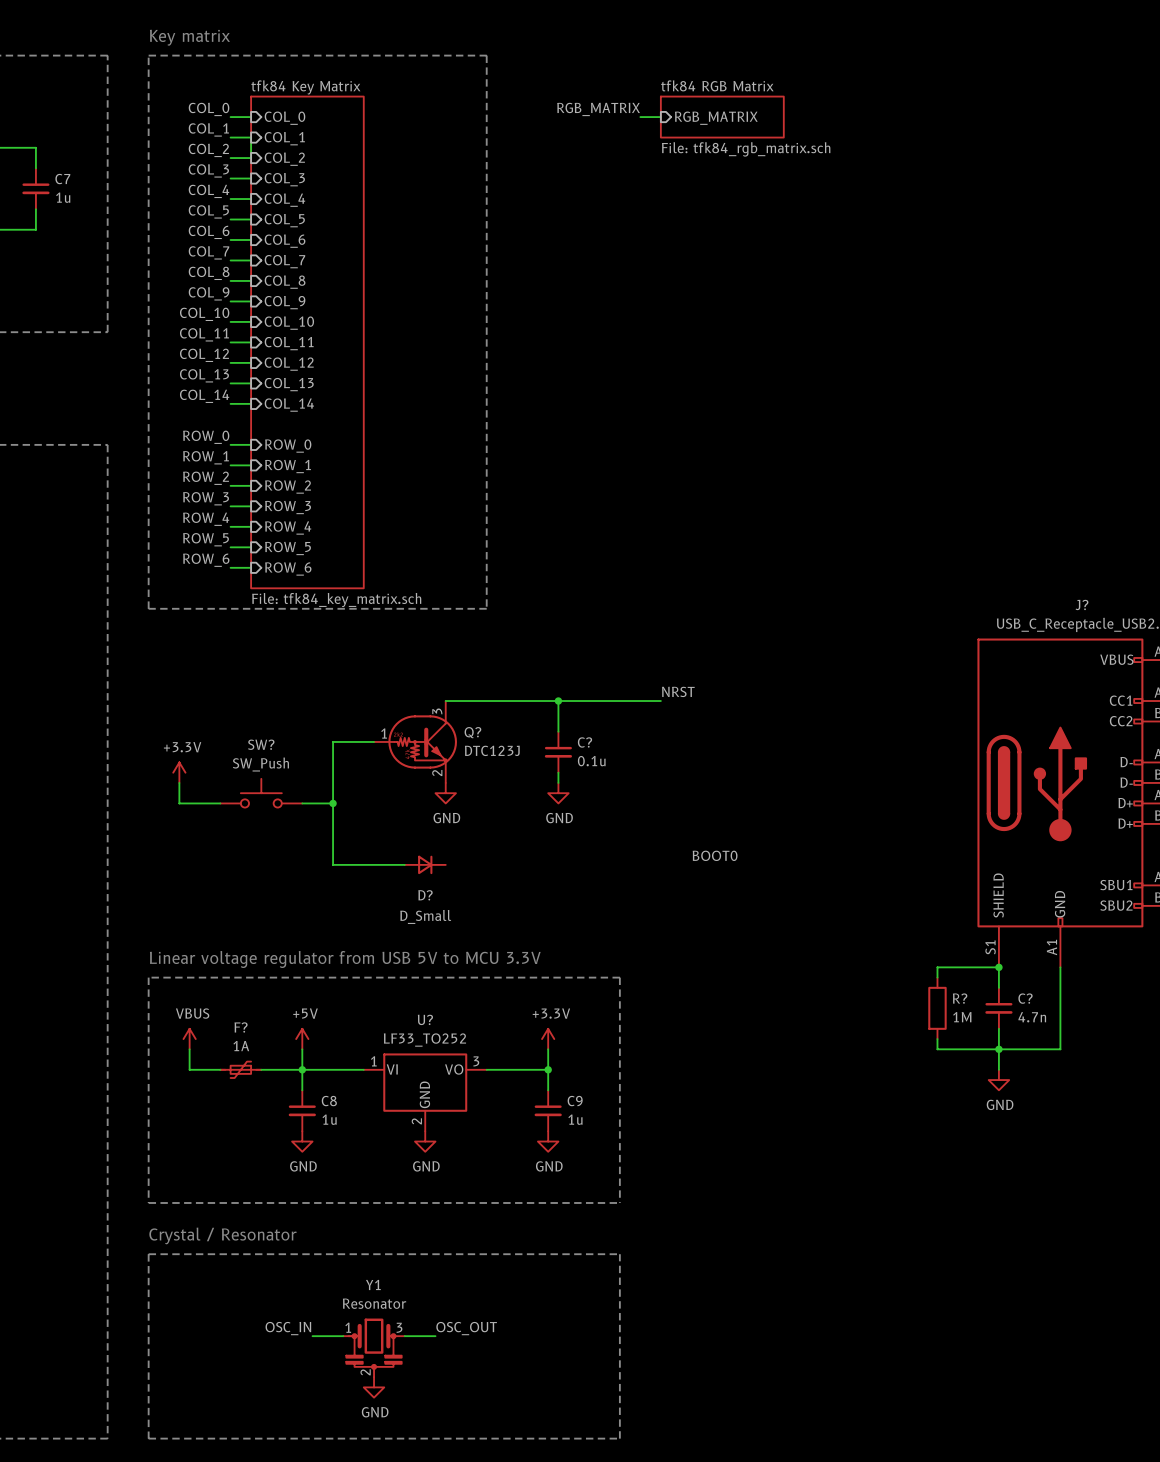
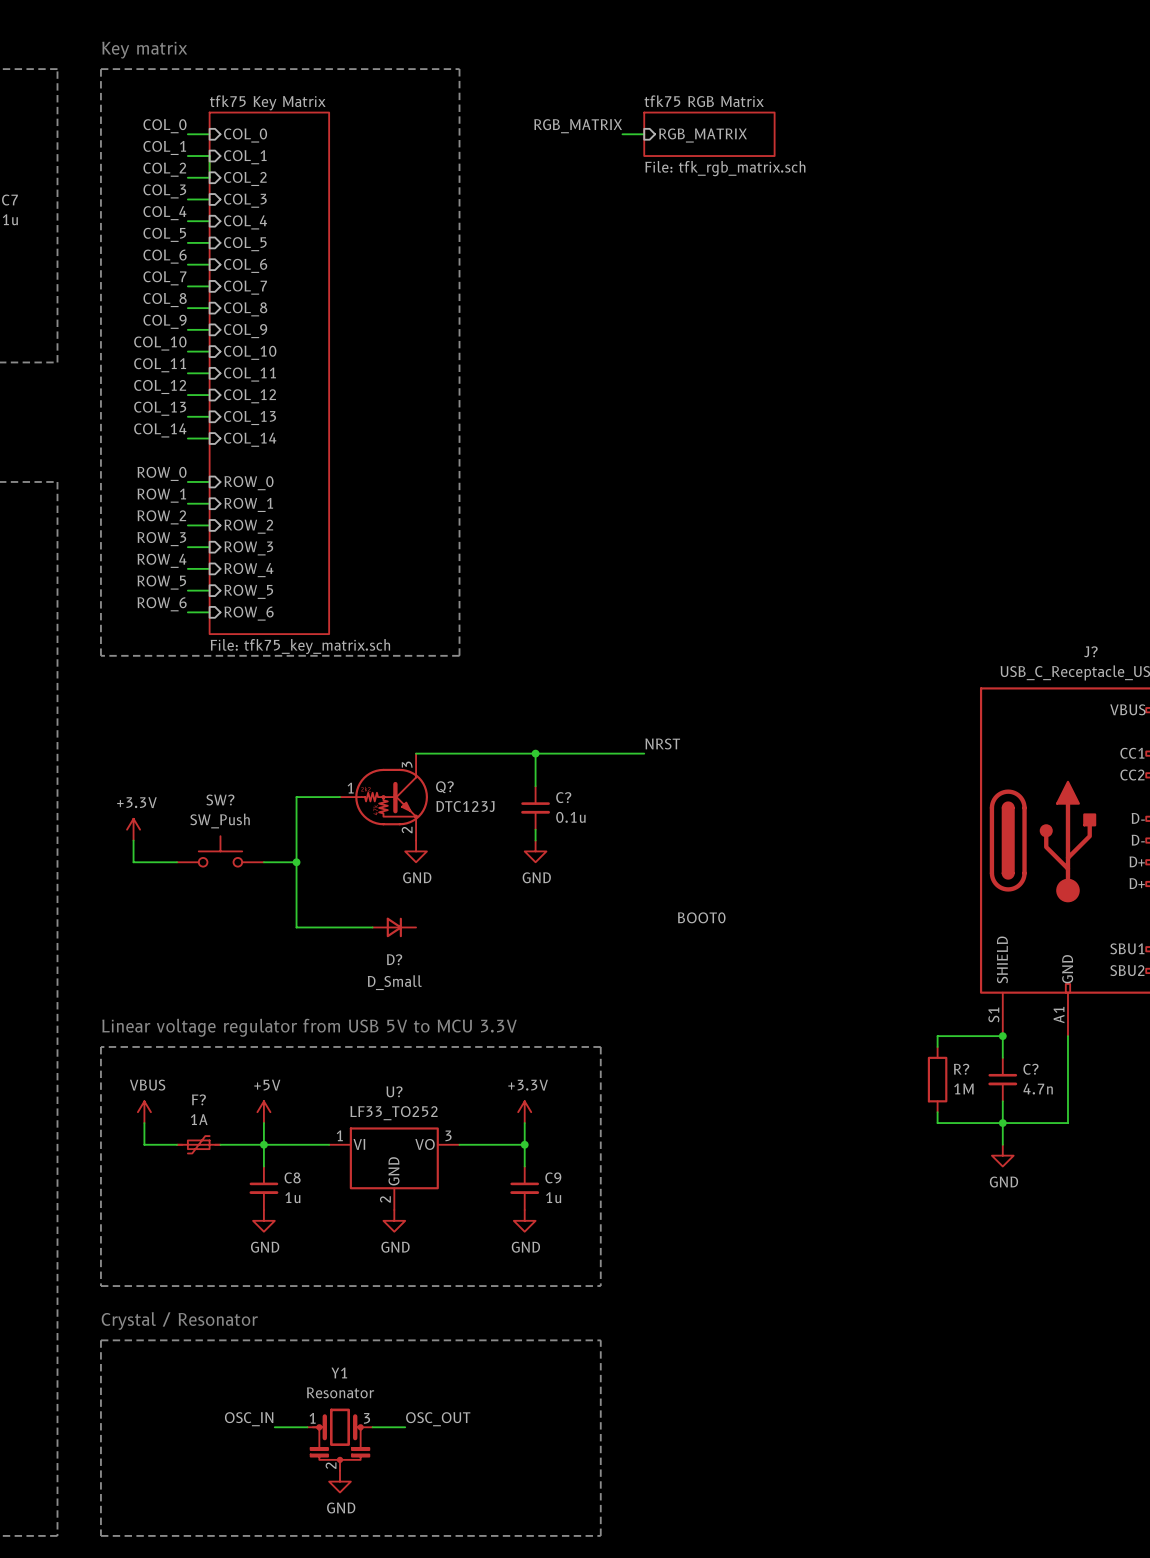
sheet tfk84 RGB Matrix name: tfk84 RGB Matrix (717, 85) -> tfk75 RGB Matrix (704, 101)
sheet tfk84 Key Matrix name: tfk84 Key Matrix (305, 87) -> tfk75 Key Matrix (267, 102)
sheet tfk84 RGB Matrix value: File: tfk84_rgb_matrix.sch (746, 149) -> File: tfk_rgb_matrix.sch (725, 168)
sheet tfk84 Key Matrix value: File: tfk84_key_matrix.sch (336, 600) -> File: tfk75_key_matrix.sch (300, 646)

